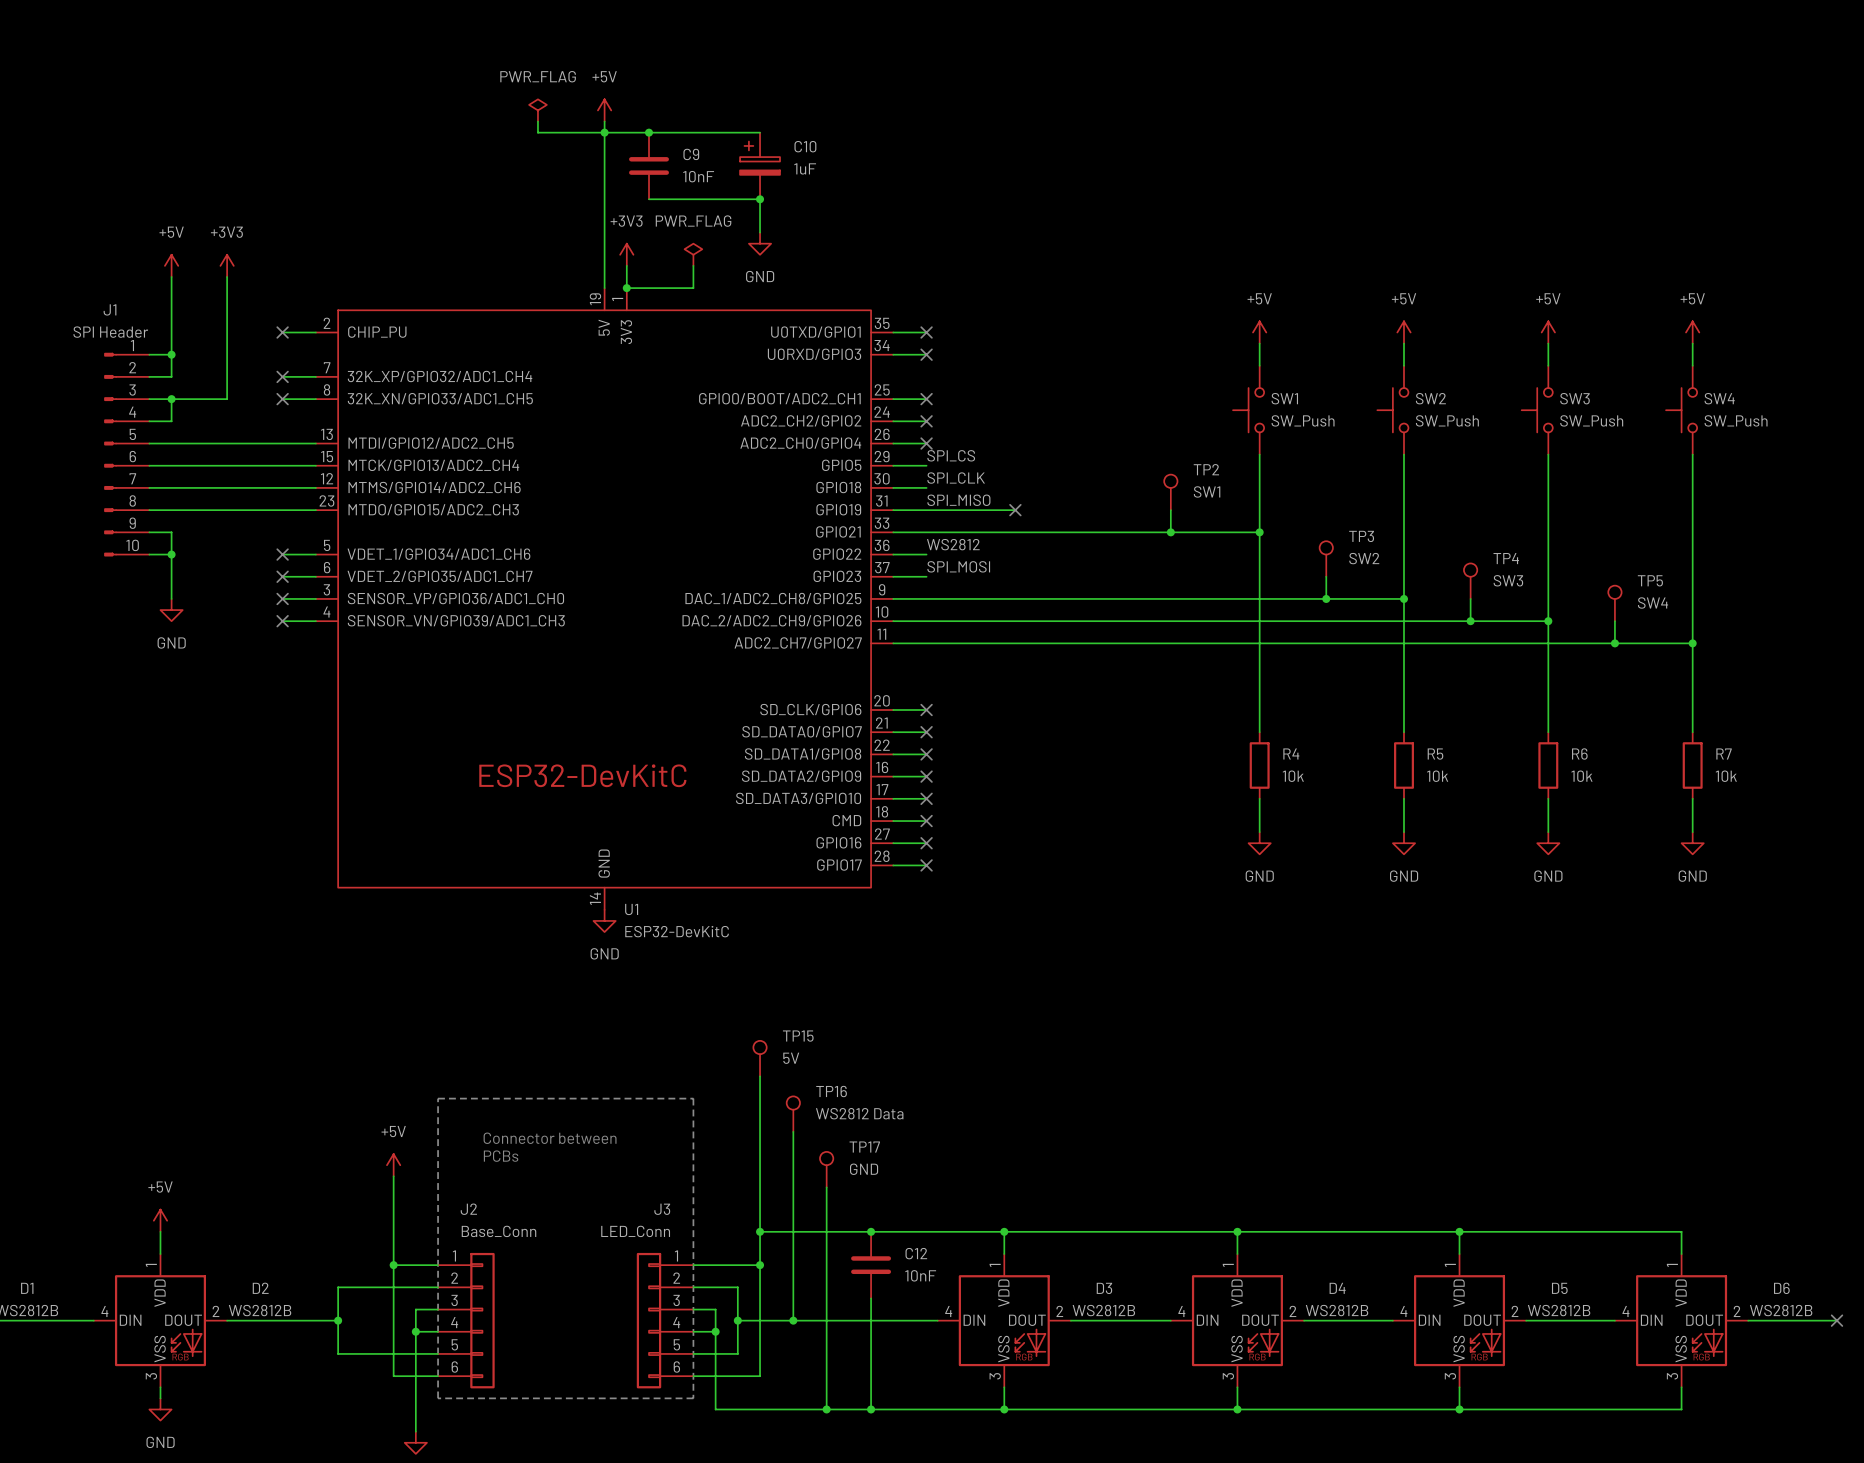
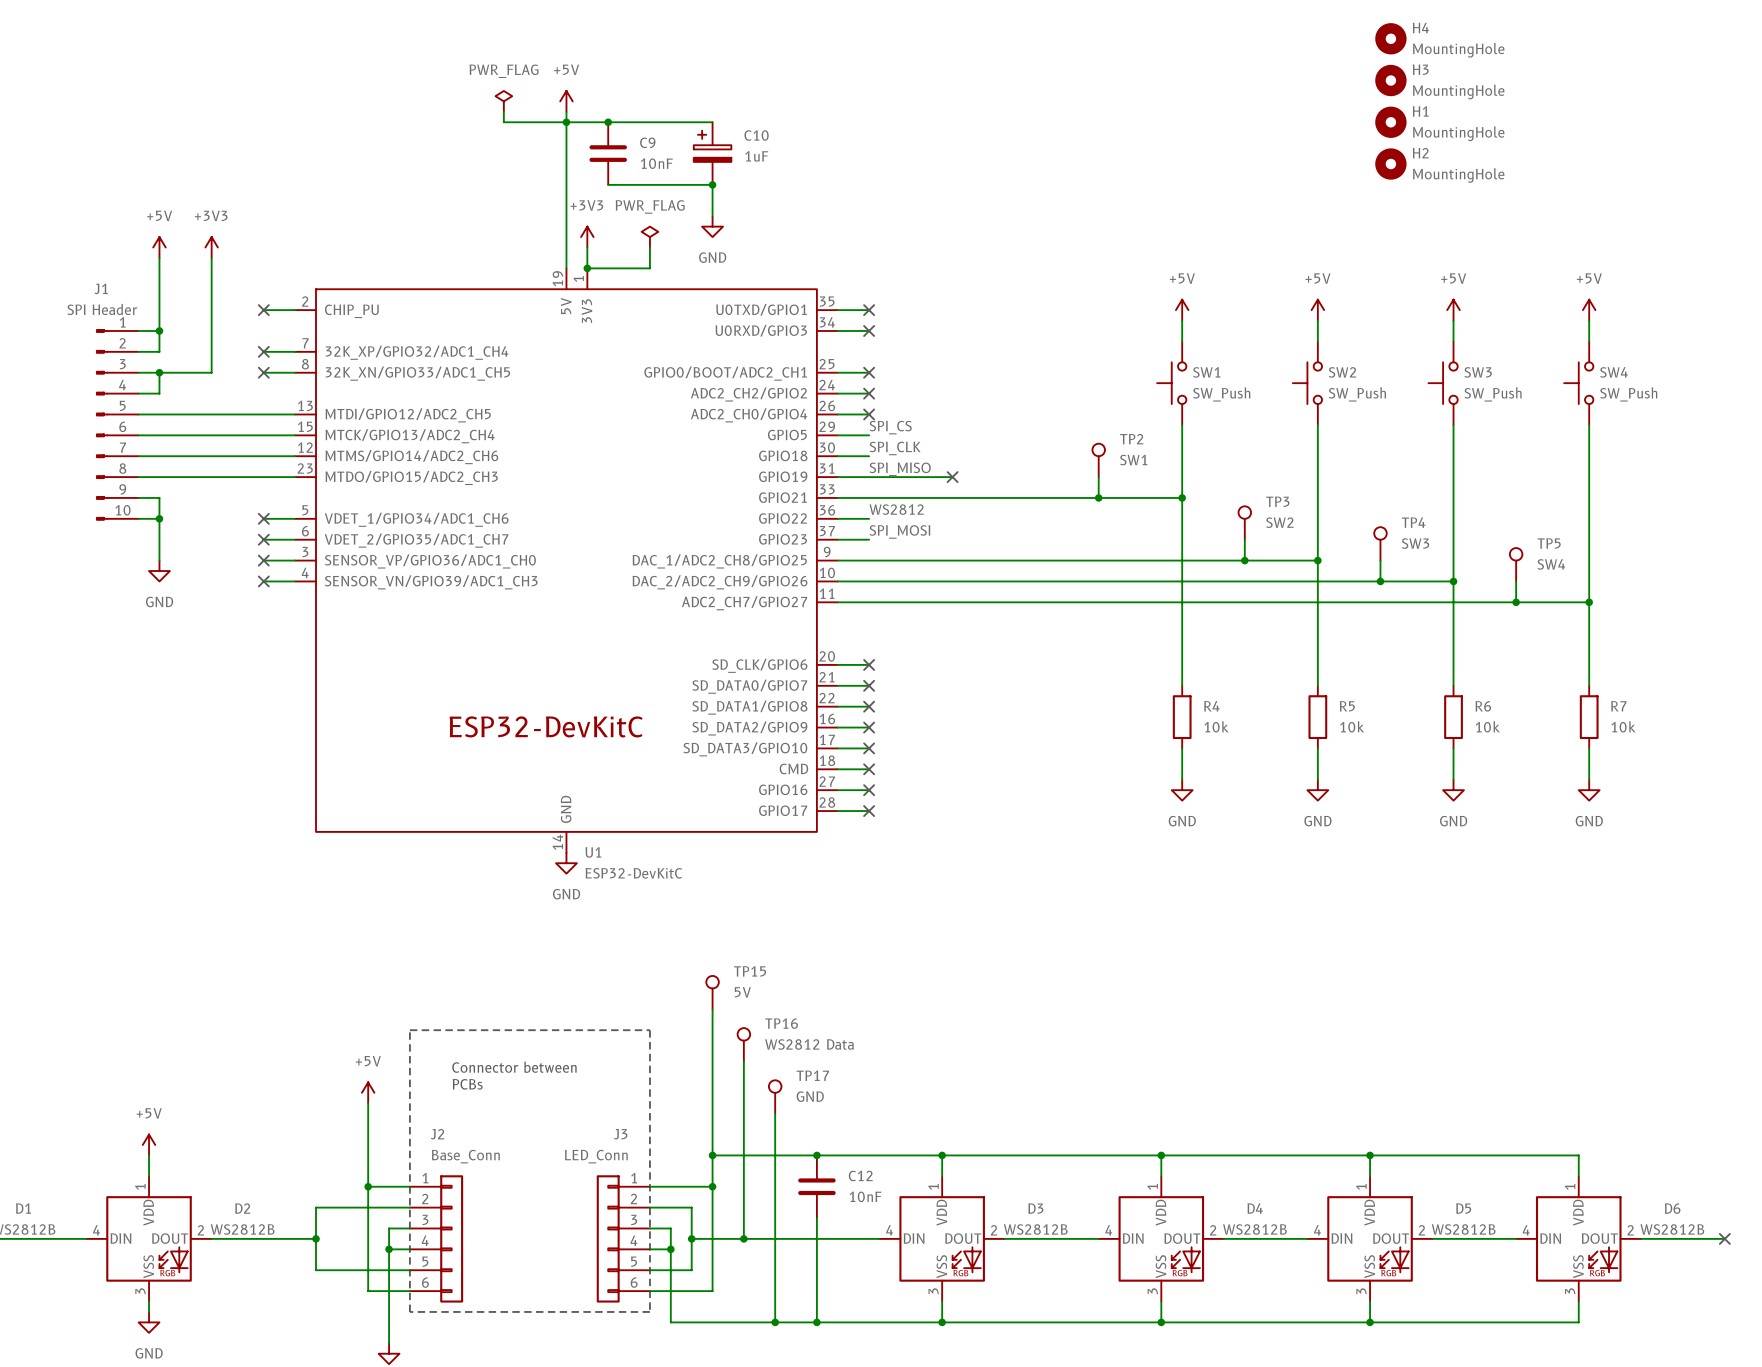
H4: none -> MountingHole (1390, 38)
H3: none -> MountingHole (1390, 80)
H1: none -> MountingHole (1390, 122)
H2: none -> MountingHole (1390, 164)

